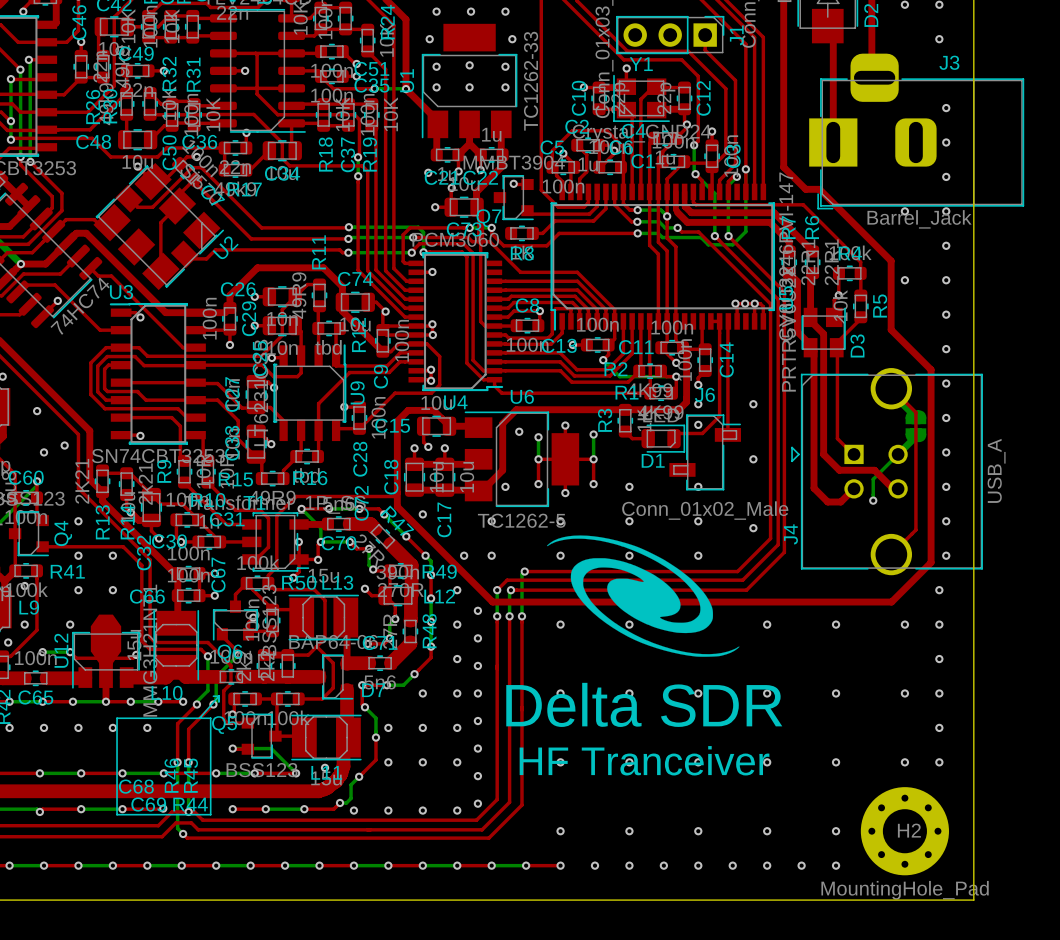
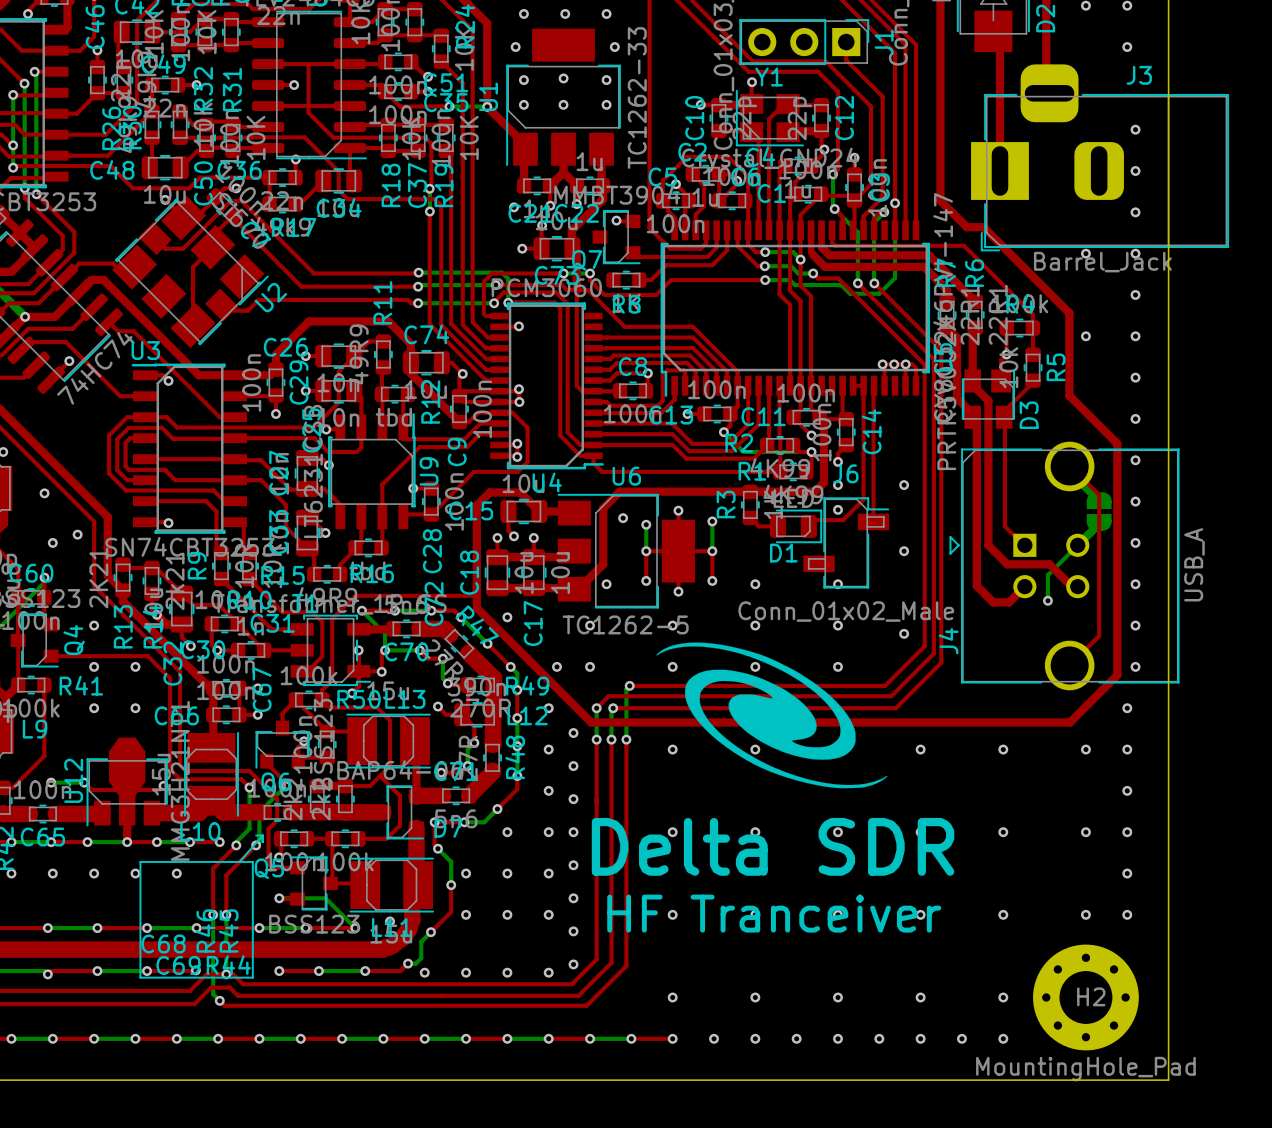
via: (24, 586) -> none
via: (24, 624) -> none
via: (70, 624) -> none
via: (8, 642) -> none

